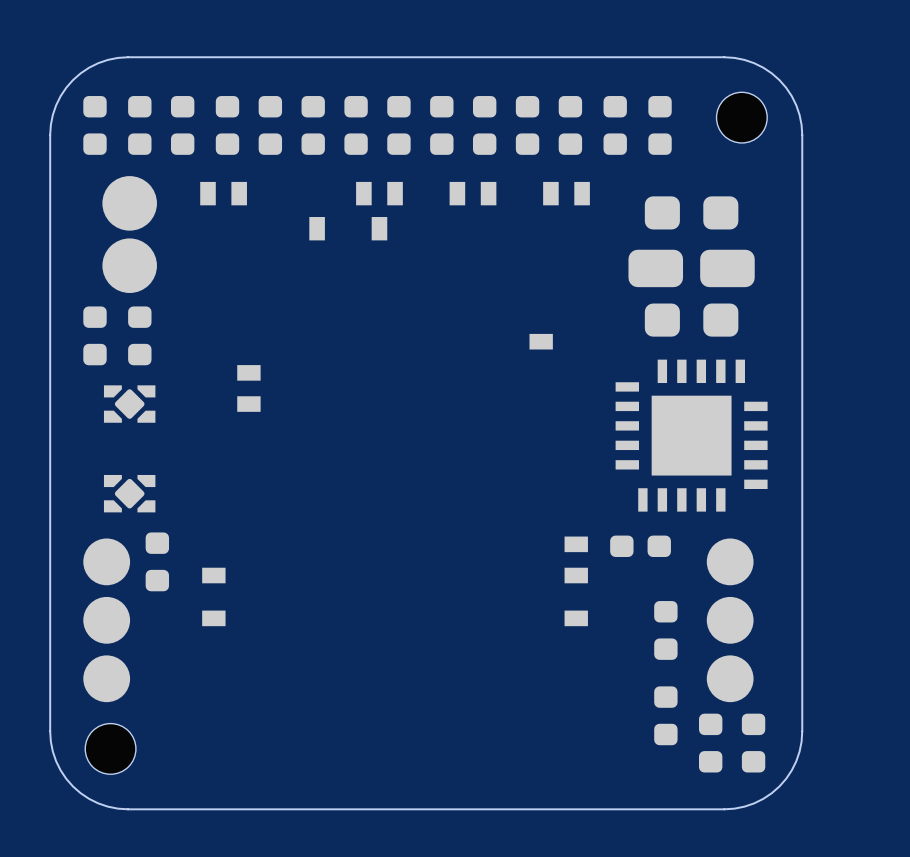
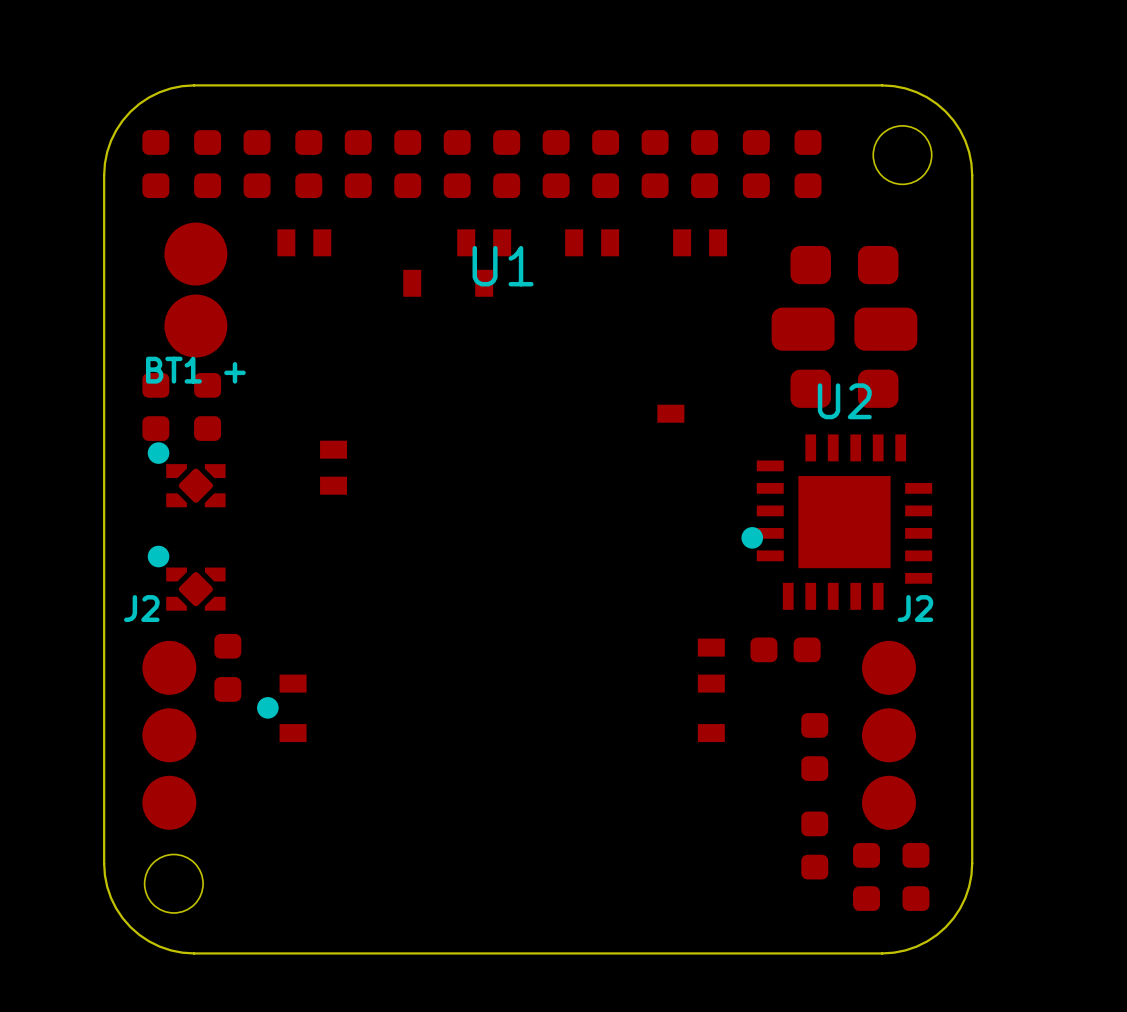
text: none -> U1 (503, 266)
text: none -> BT1 + (195, 370)
text: none -> U2 (844, 401)
drawing: none -> [147, 442, 170, 464]
drawing: none -> [741, 527, 764, 549]
drawing: none -> [147, 545, 170, 568]
text: none -> J2 (141, 608)
text: none -> J2 (915, 608)
drawing: none -> [257, 697, 279, 719]

